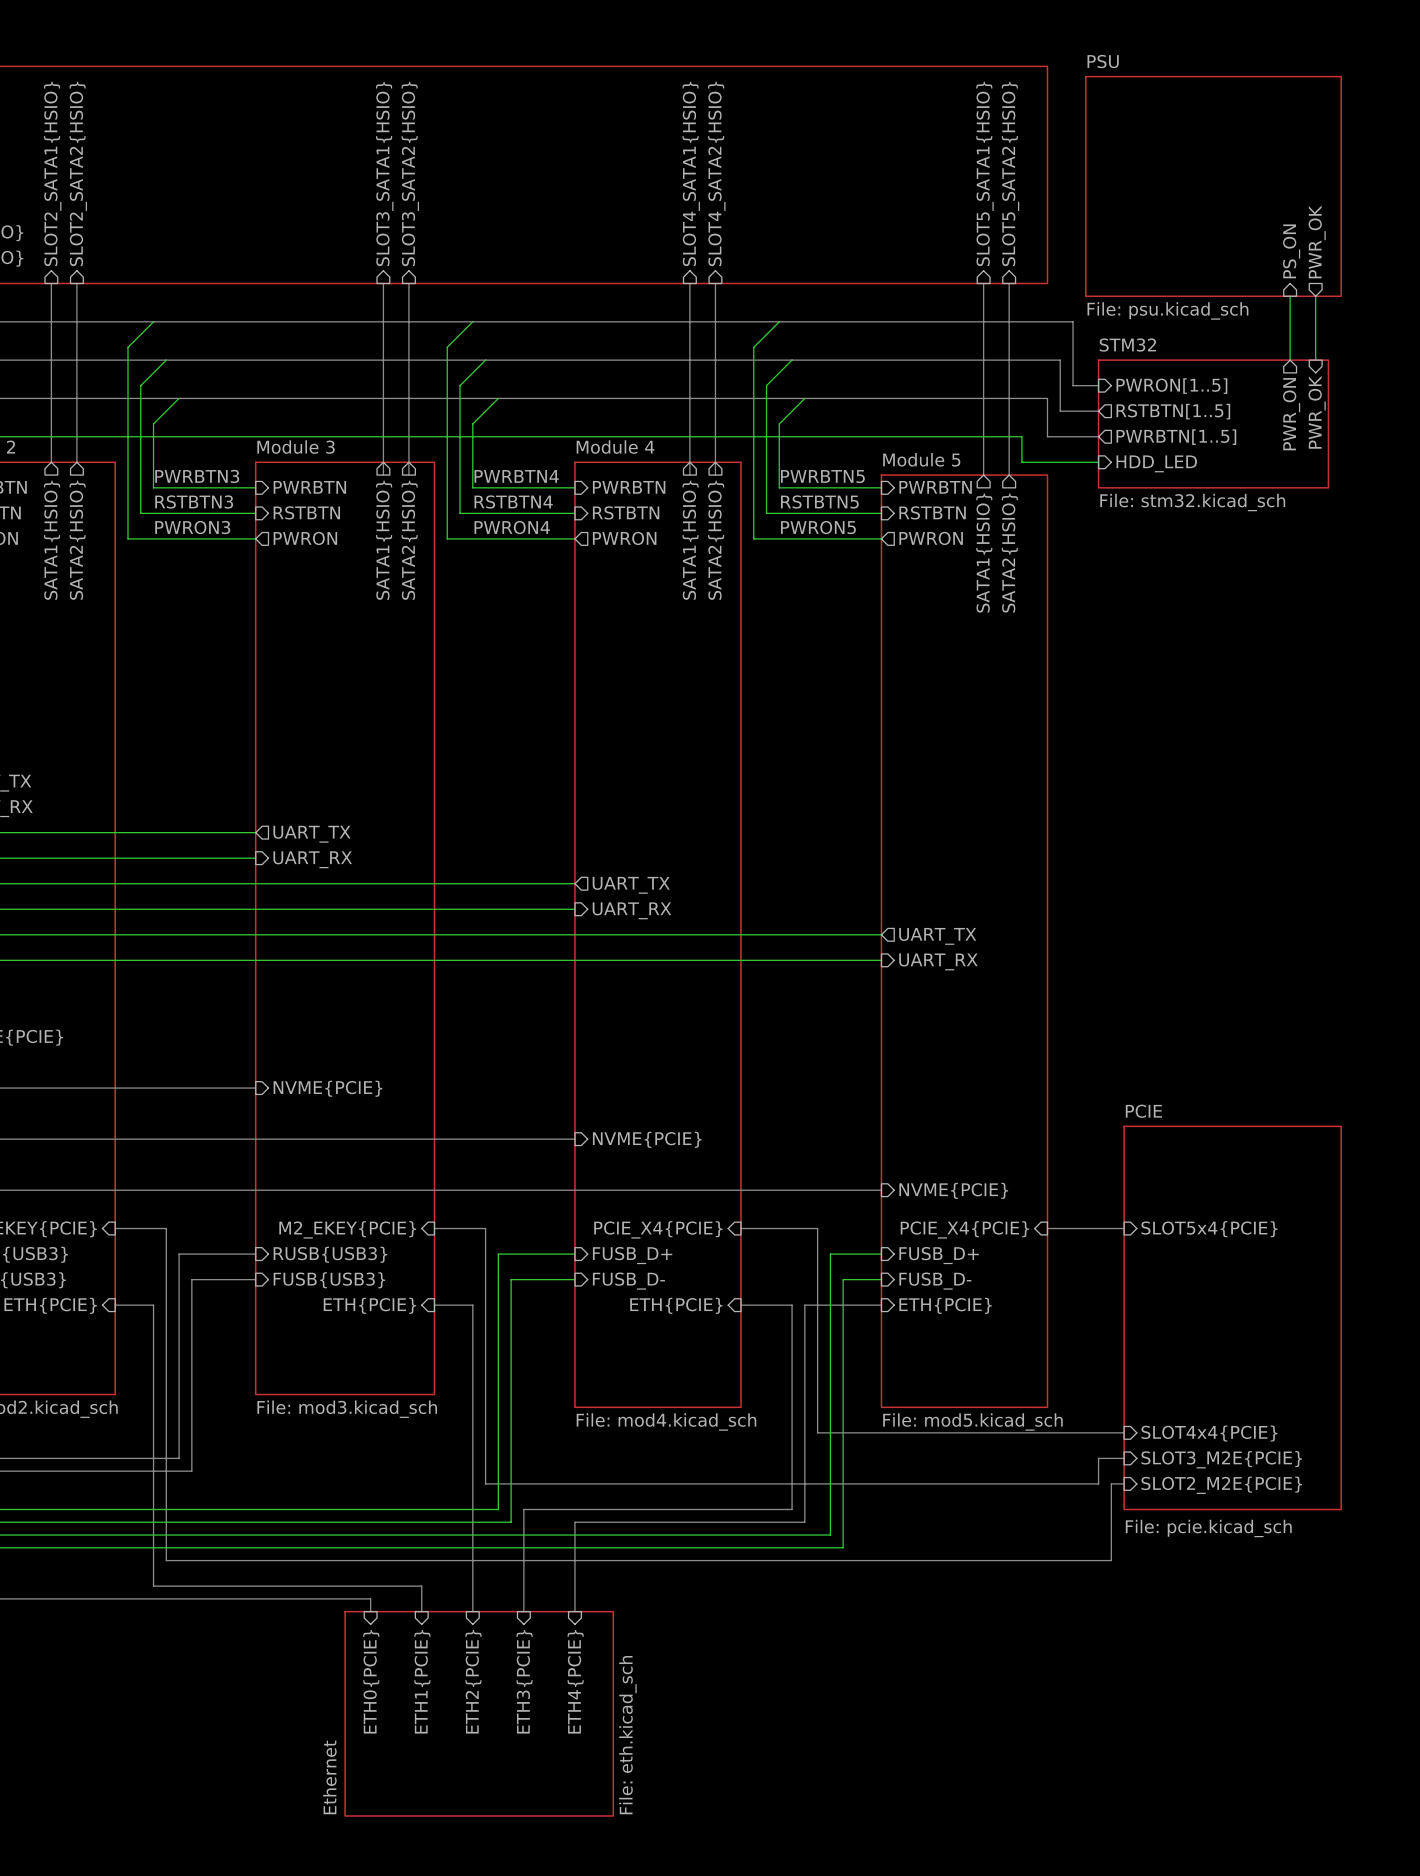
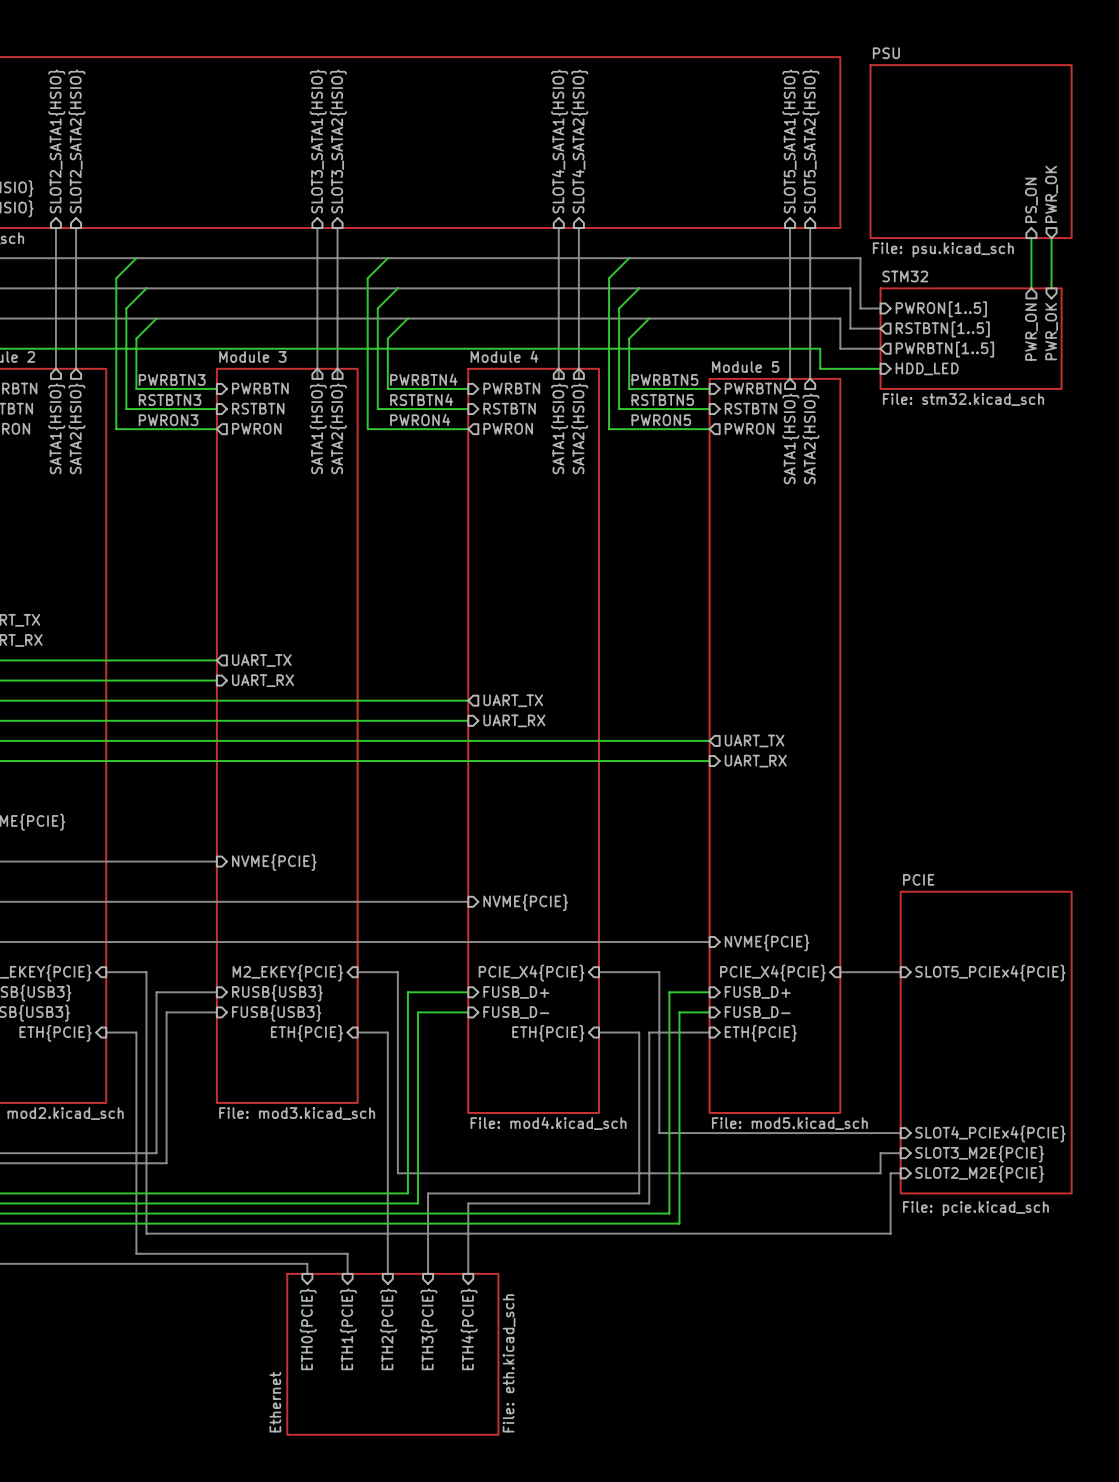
sheet pin: SLOT5x4{PCIE} (1209, 1229) -> SLOT5_PCIEx4{PCIE} (990, 973)
sheet pin: SLOT4x4{PCIE} (1209, 1433) -> SLOT4_PCIEx4{PCIE} (990, 1133)

